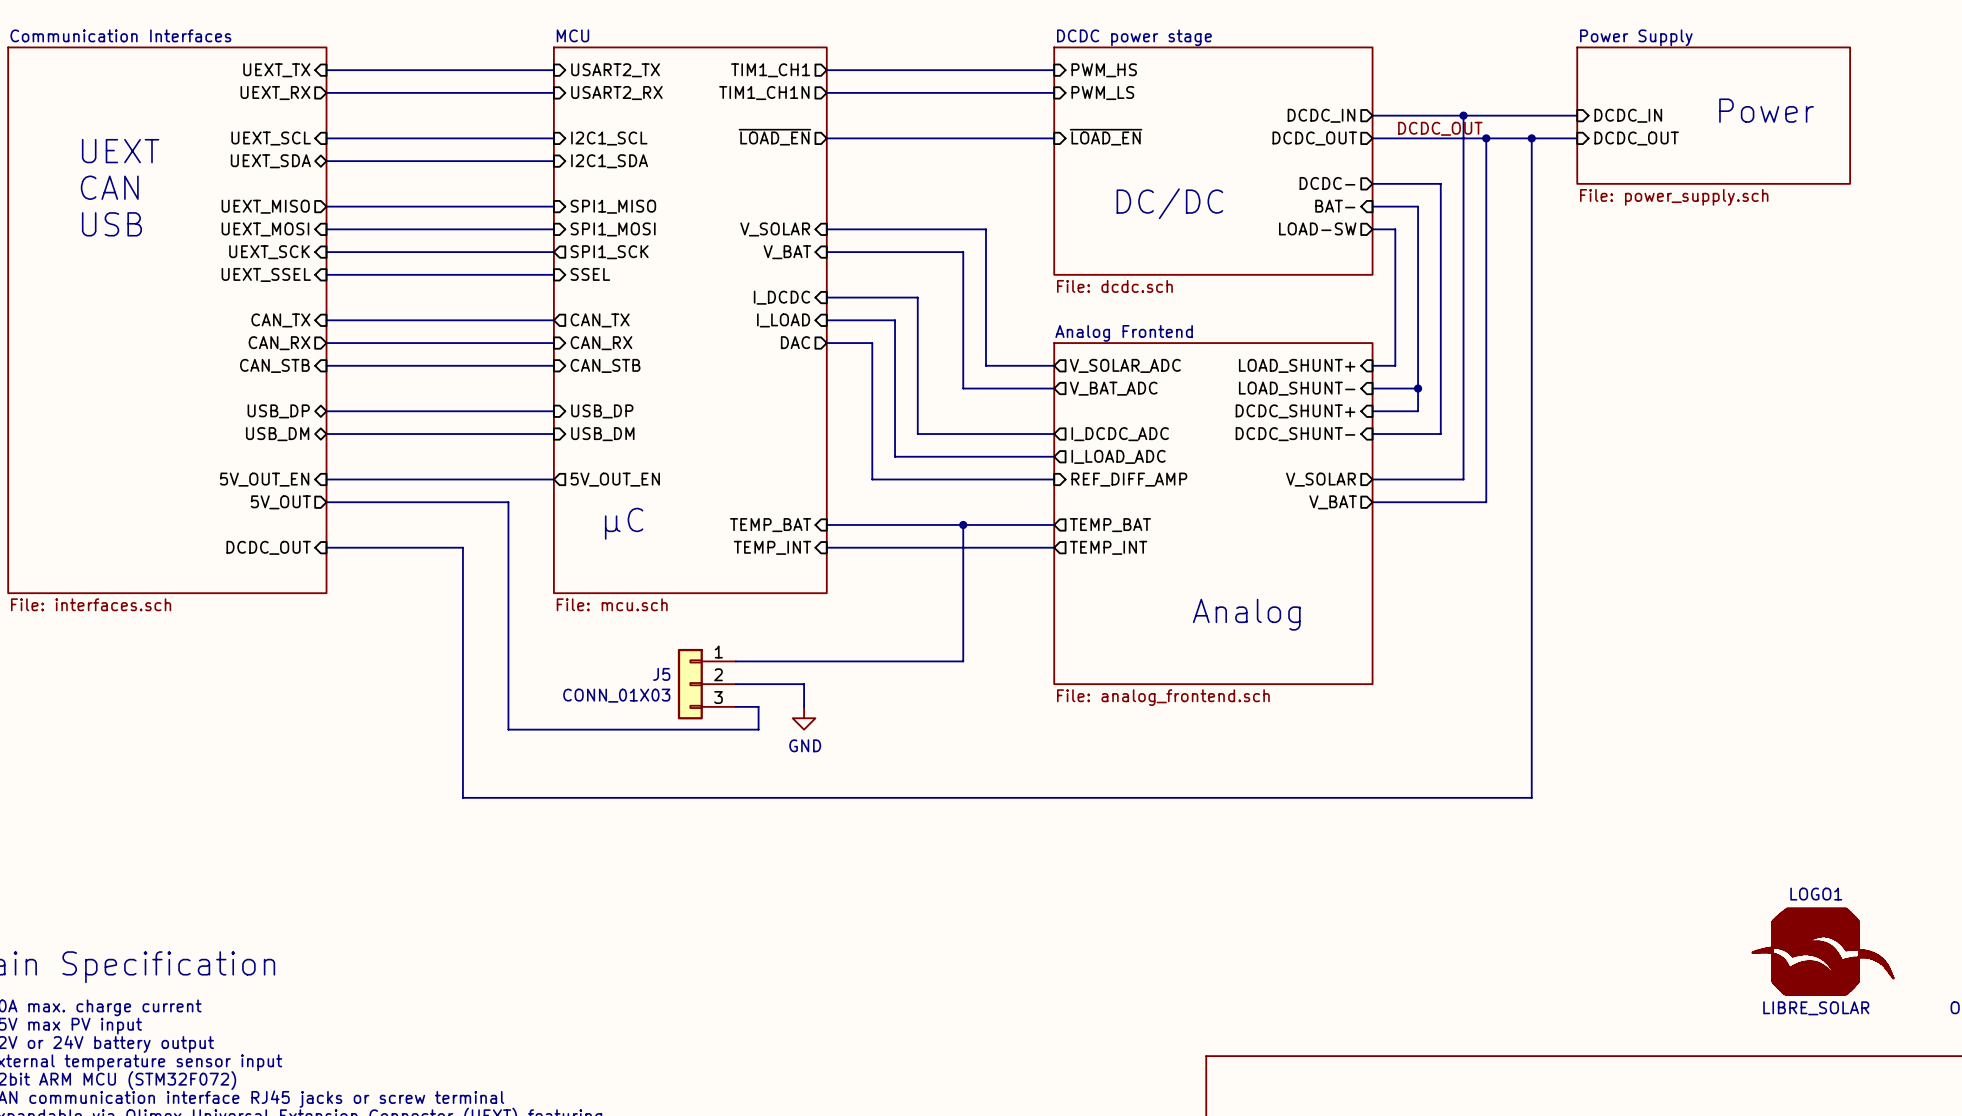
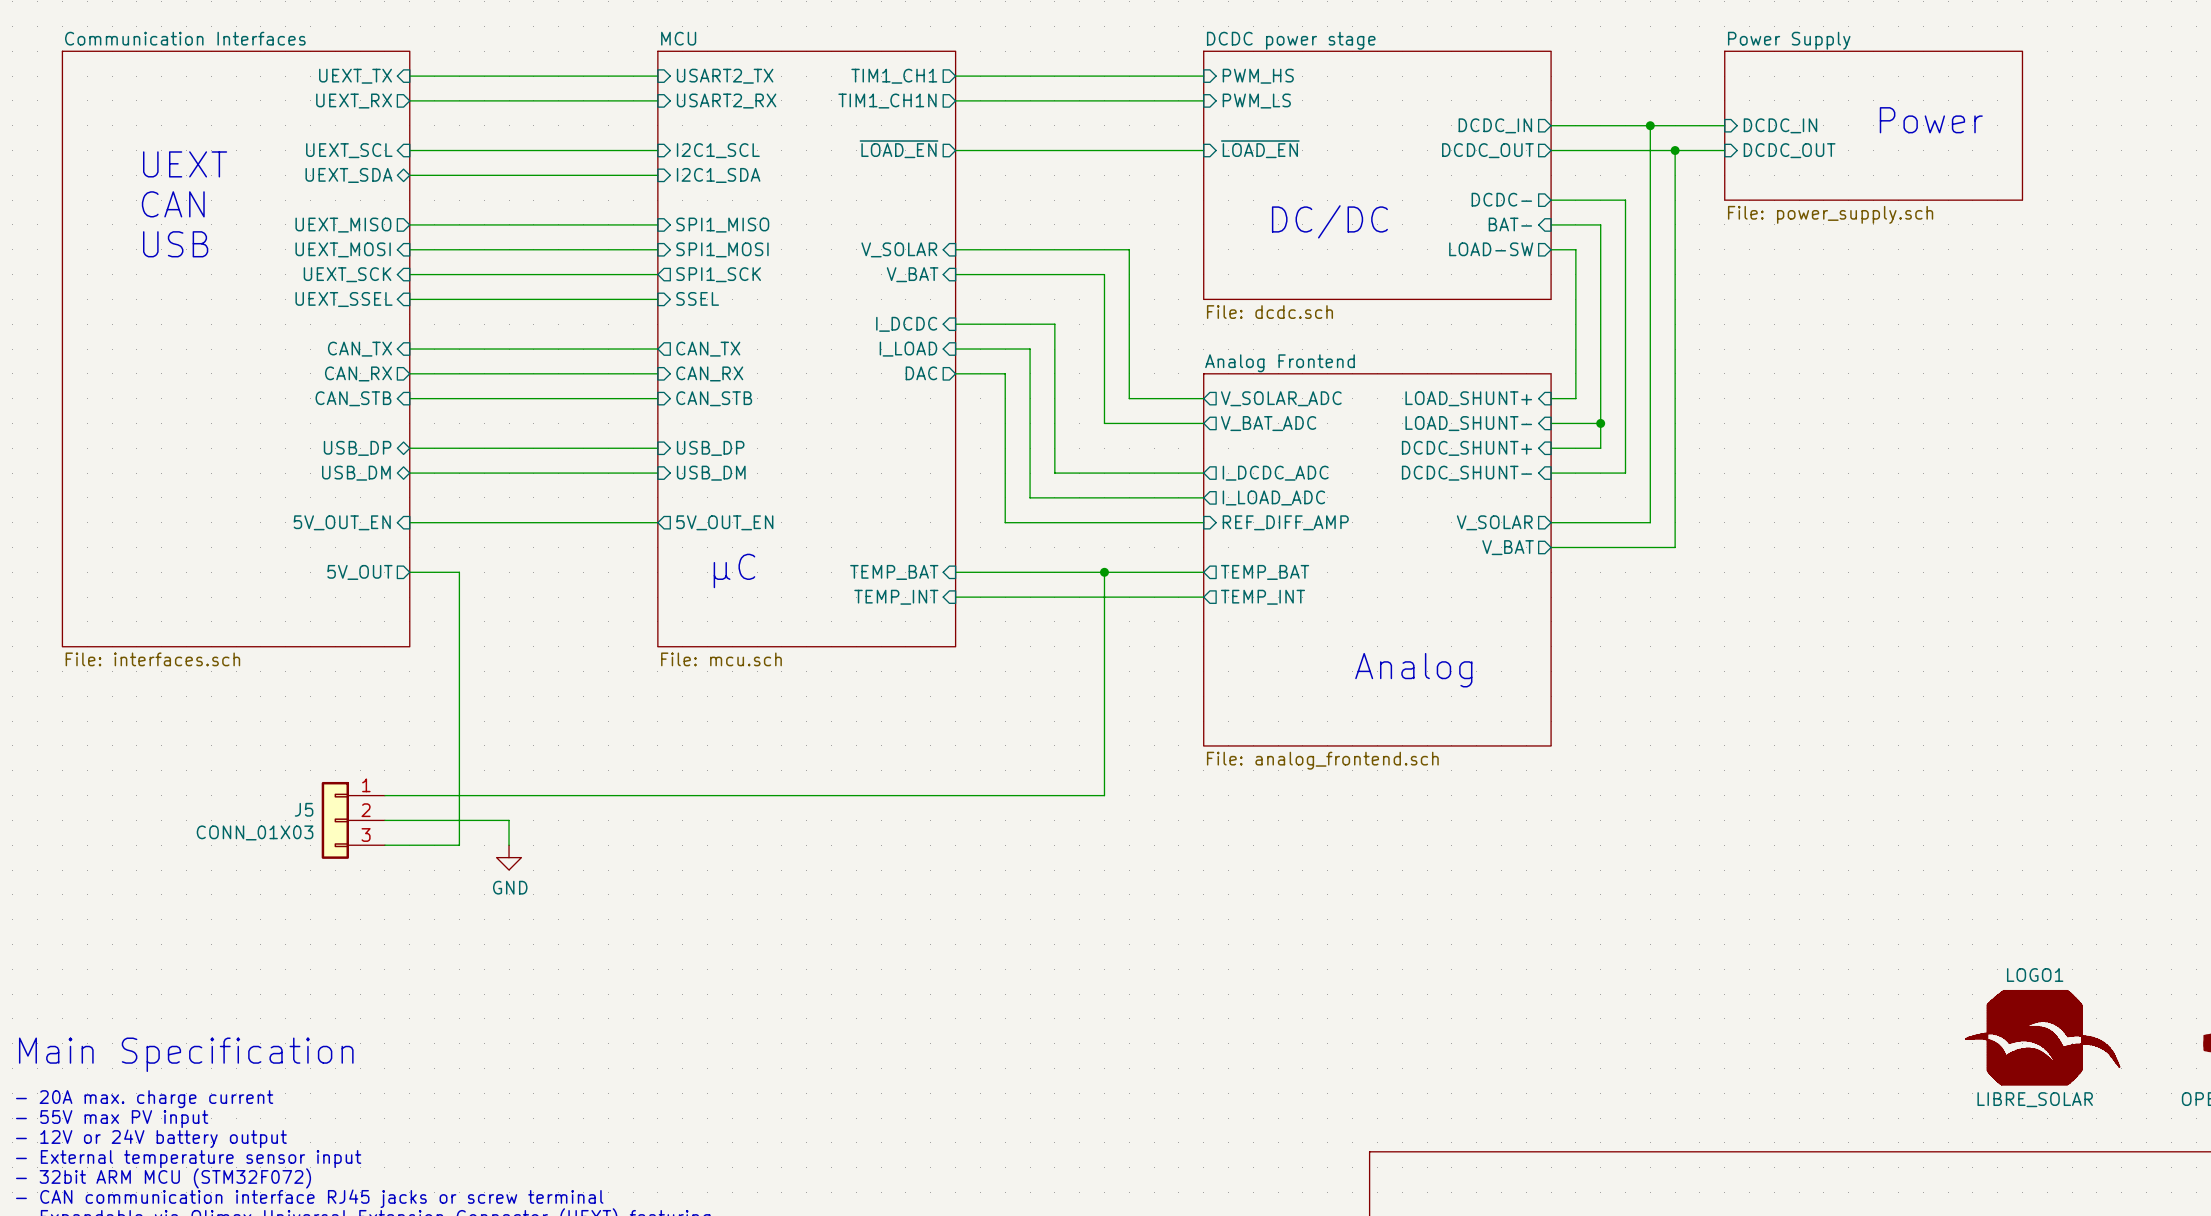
text position: Power (1766, 110) -> Power (1931, 120)
wire: (1531, 115) (1577, 115) -> none
sheet pin position: DCDC_IN (1628, 115) -> DCDC_IN (1780, 125)
sheet Power Supply position: (1713, 115) -> (1873, 125)
label: DCDC_OUT (1440, 128) -> none
junction: (1531, 138) -> none
wire: (1577, 138) (1531, 138) (1531, 797) (462, 797) (462, 547) (326, 547) -> none
sheet pin position: DCDC_OUT (1636, 138) -> DCDC_OUT (1789, 150)
sheet pin position: 5V_OUT (280, 502) -> 5V_OUT (359, 572)
wire: (326, 502) (508, 502) (508, 729) -> (384, 795) (608, 795)
wire: none -> (409, 572) (459, 572) (459, 845) (384, 845)
sheet pin: DCDC_OUT (268, 547) -> none
wire: (735, 661) (963, 661) -> (881, 795) (1104, 795) (1104, 721)
J5 position: (706, 684) -> (353, 820)
wire: (735, 684) (804, 684) (804, 706) -> none
wire: (735, 706) (758, 706) (758, 729) -> none
power symbol: GND (804, 718) -> none
wire: none -> (384, 820) (509, 820) (509, 845)
power symbol: none -> GND (509, 857)

